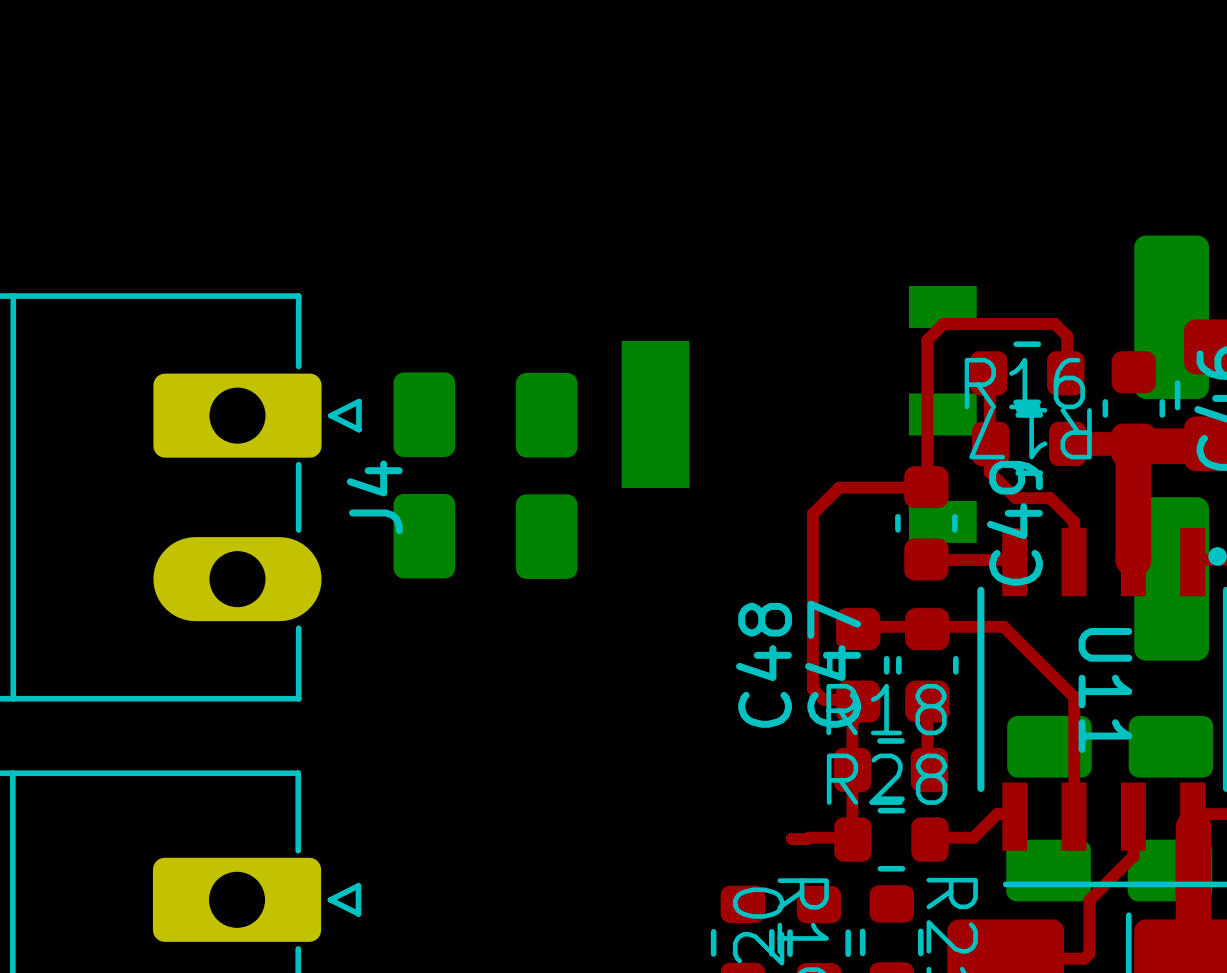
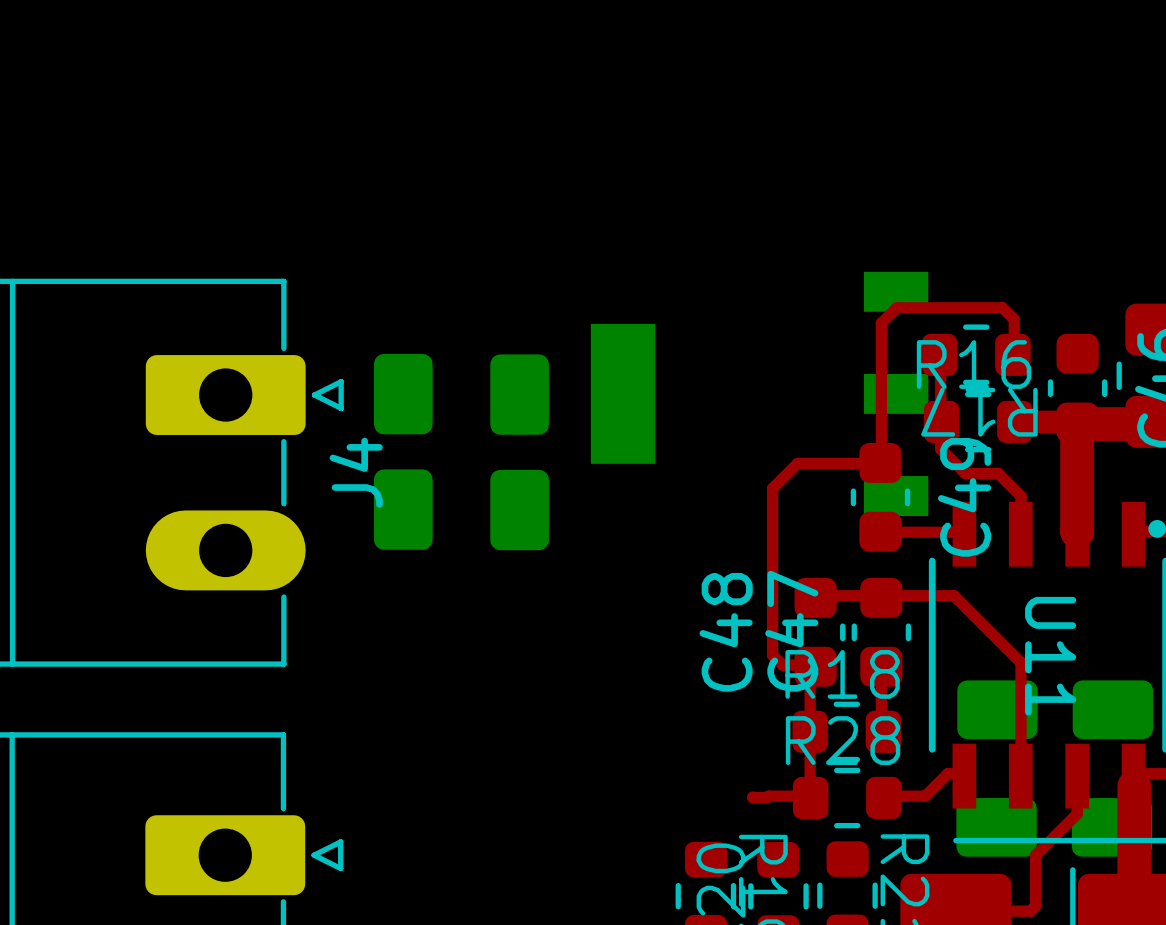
part: (1171, 448) -> none

